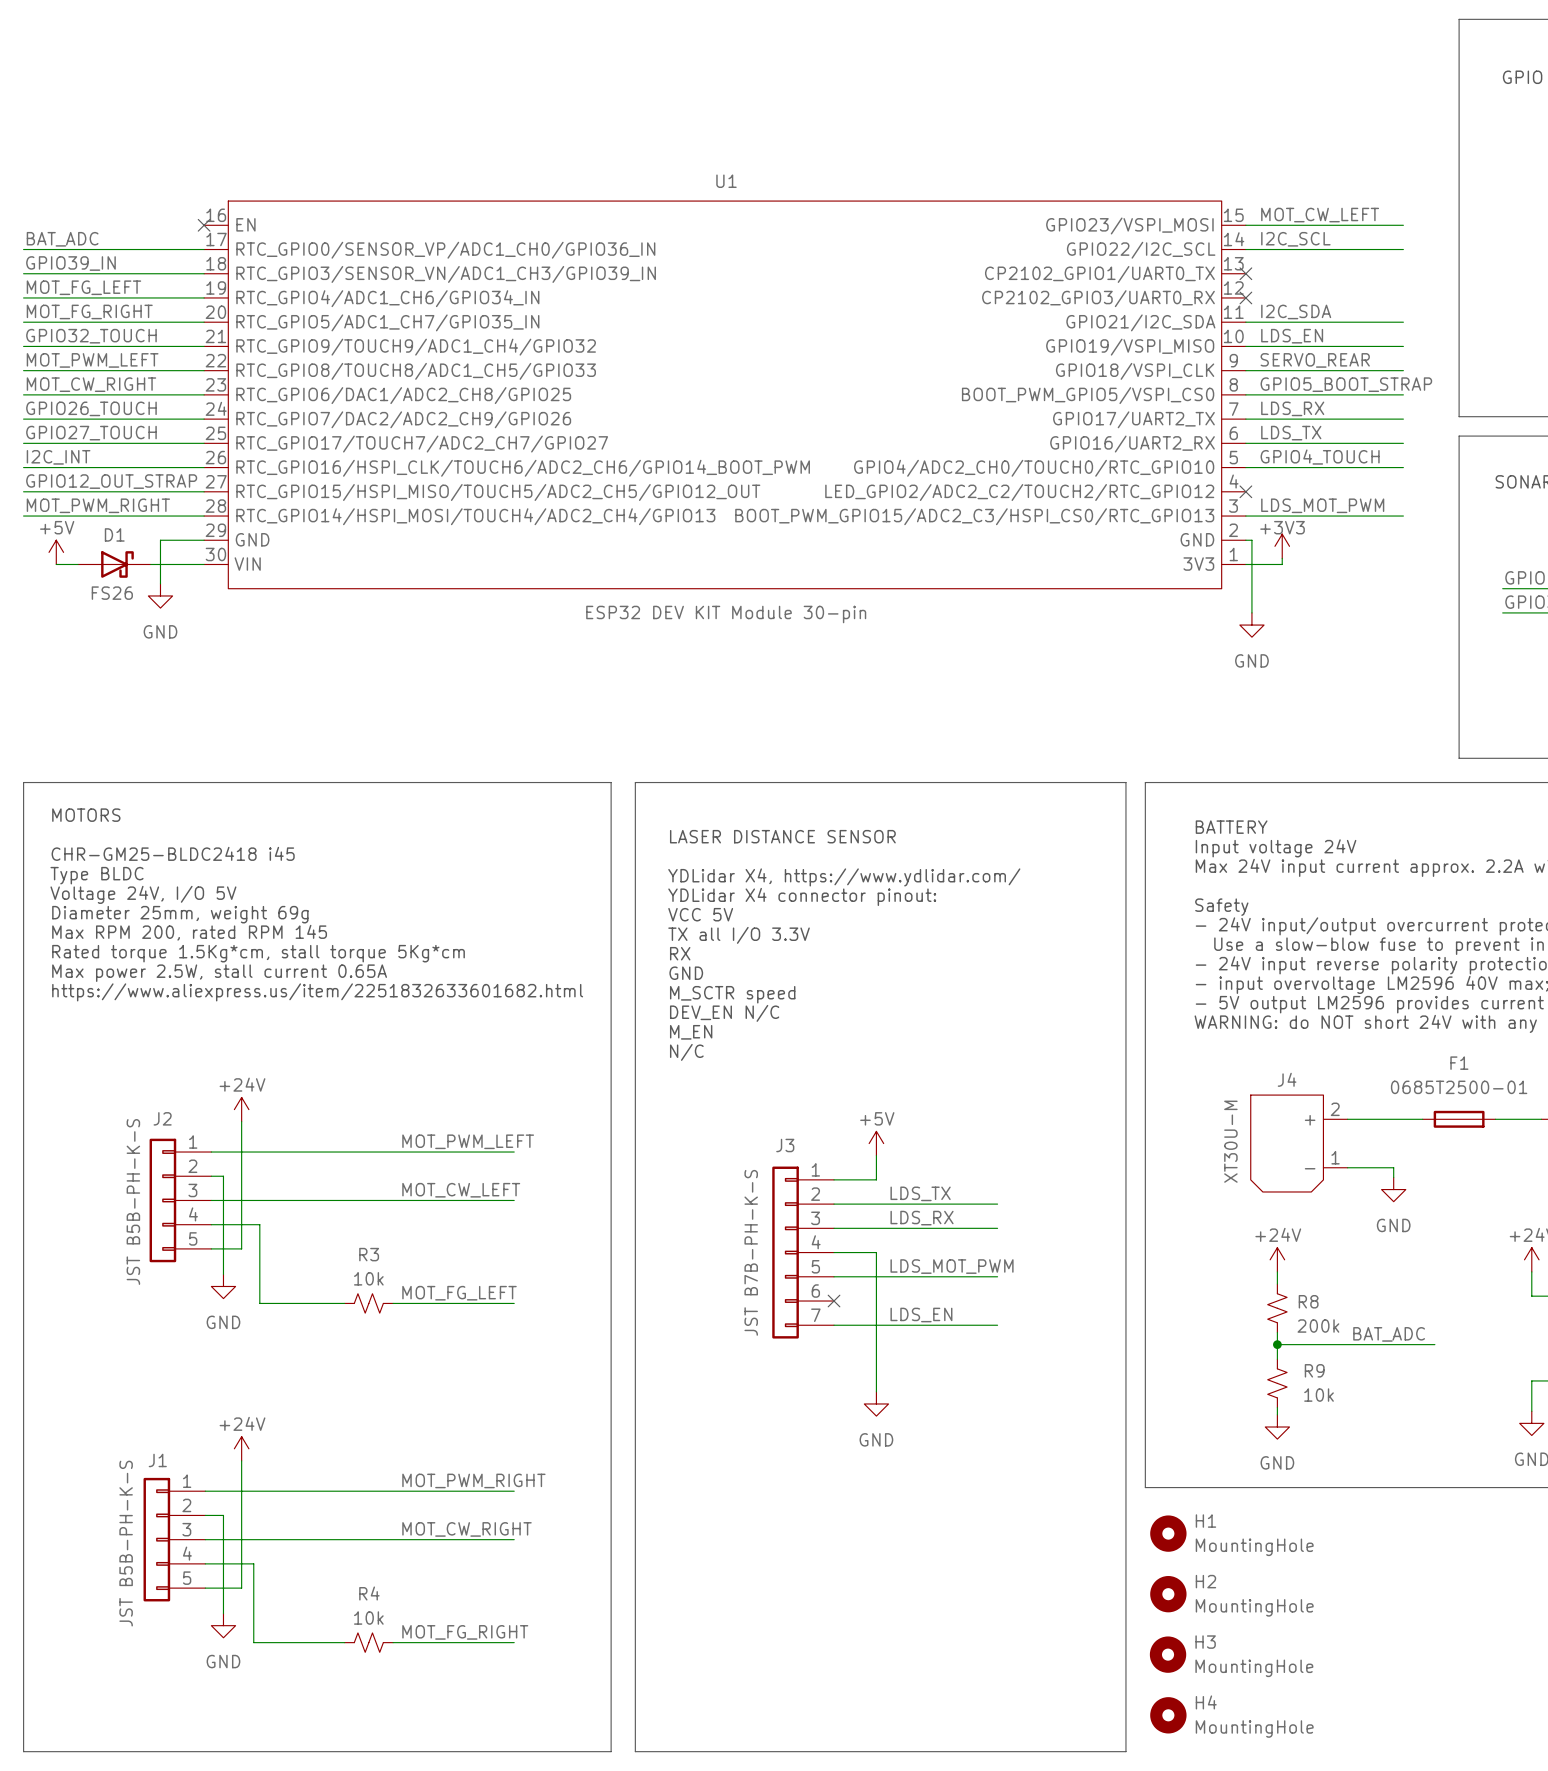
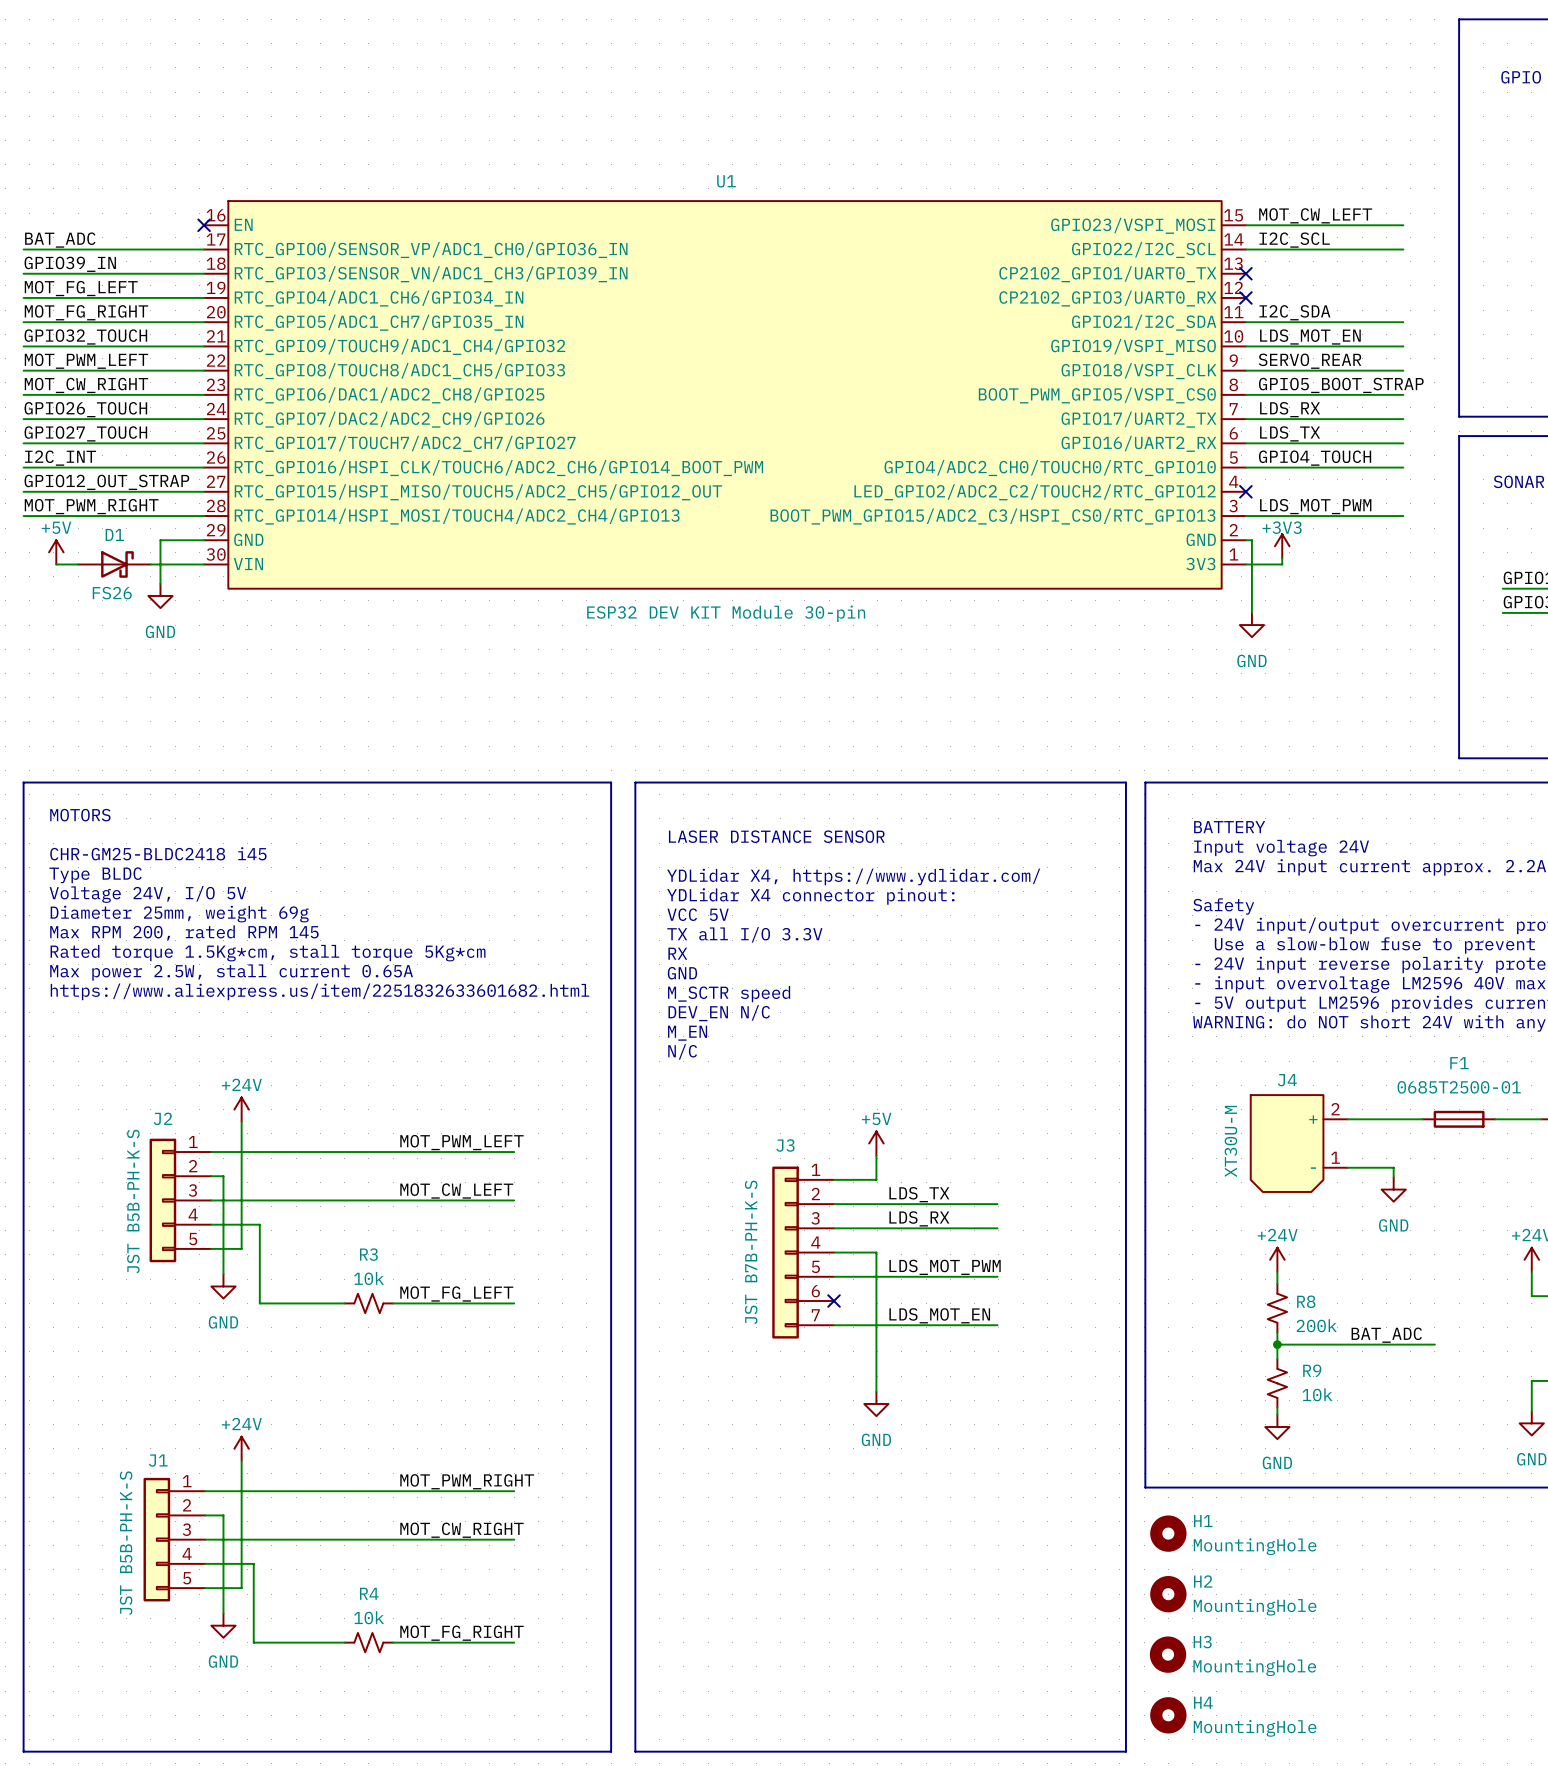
label: LDS_EN (1292, 336) -> LDS_MOT_EN (1310, 336)
label: LDS_EN (921, 1315) -> LDS_MOT_EN (939, 1315)

